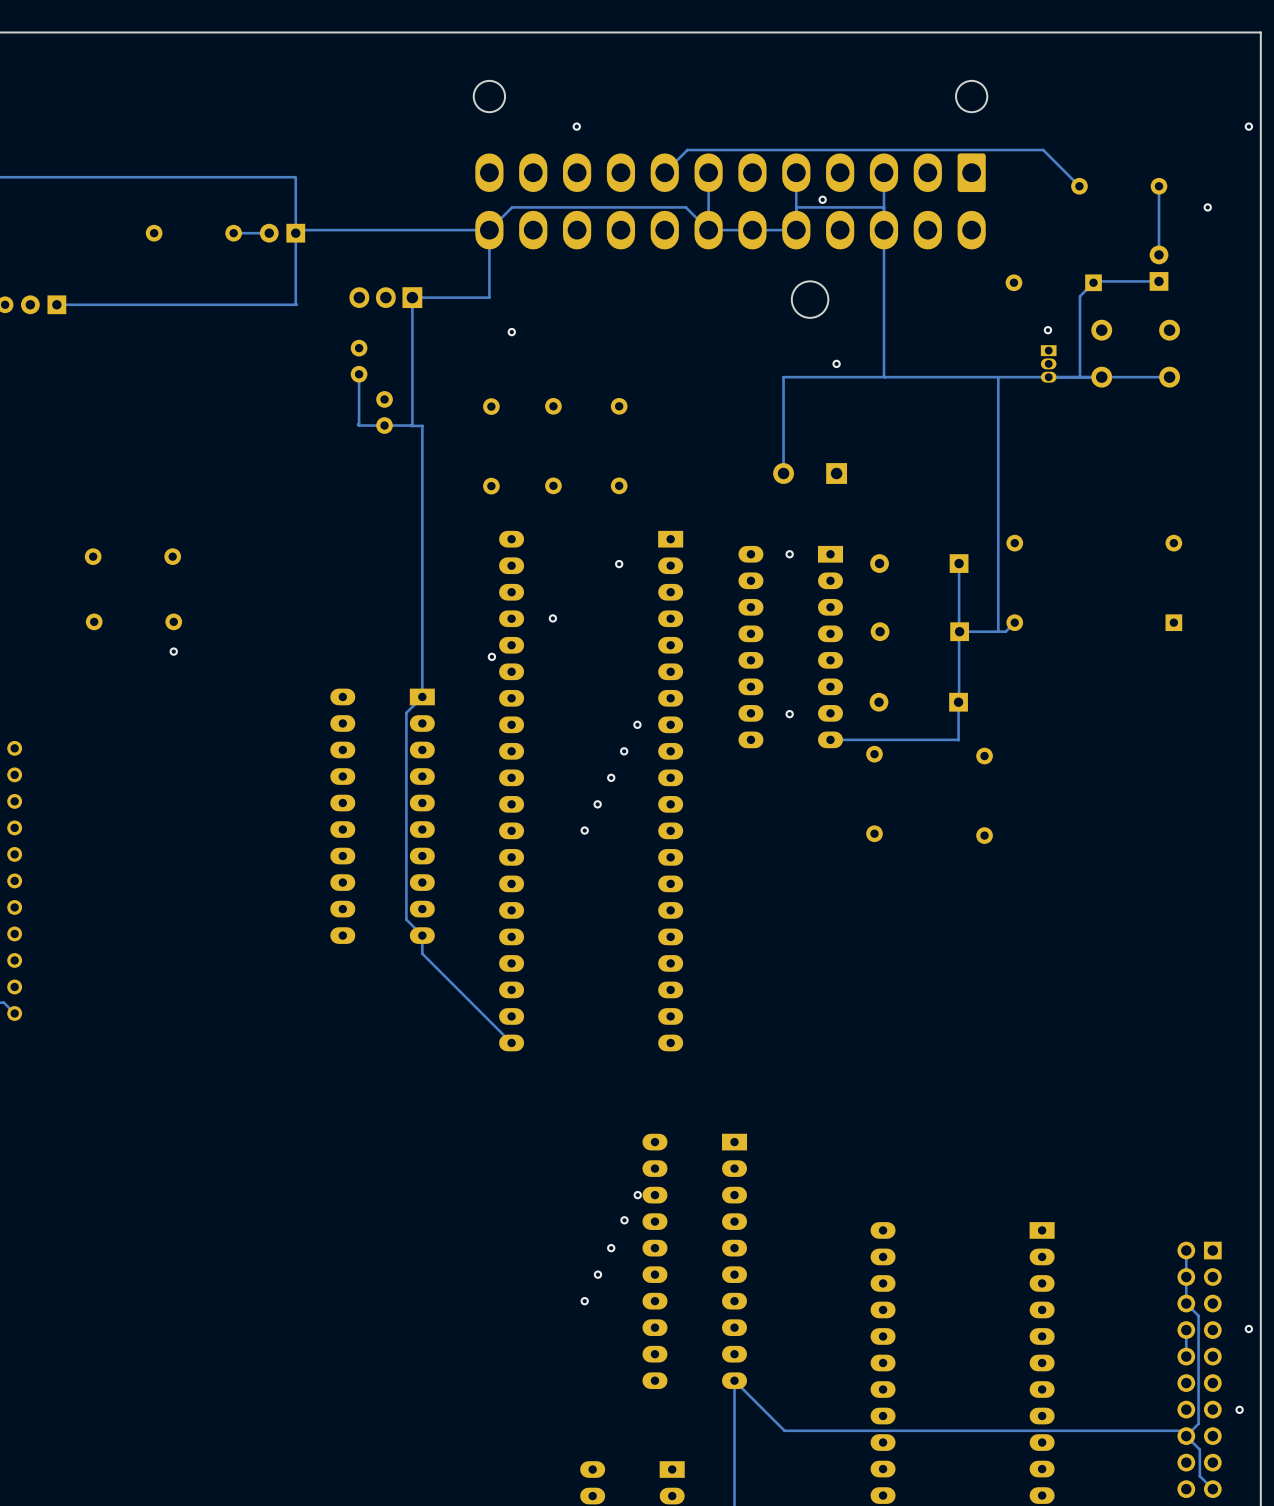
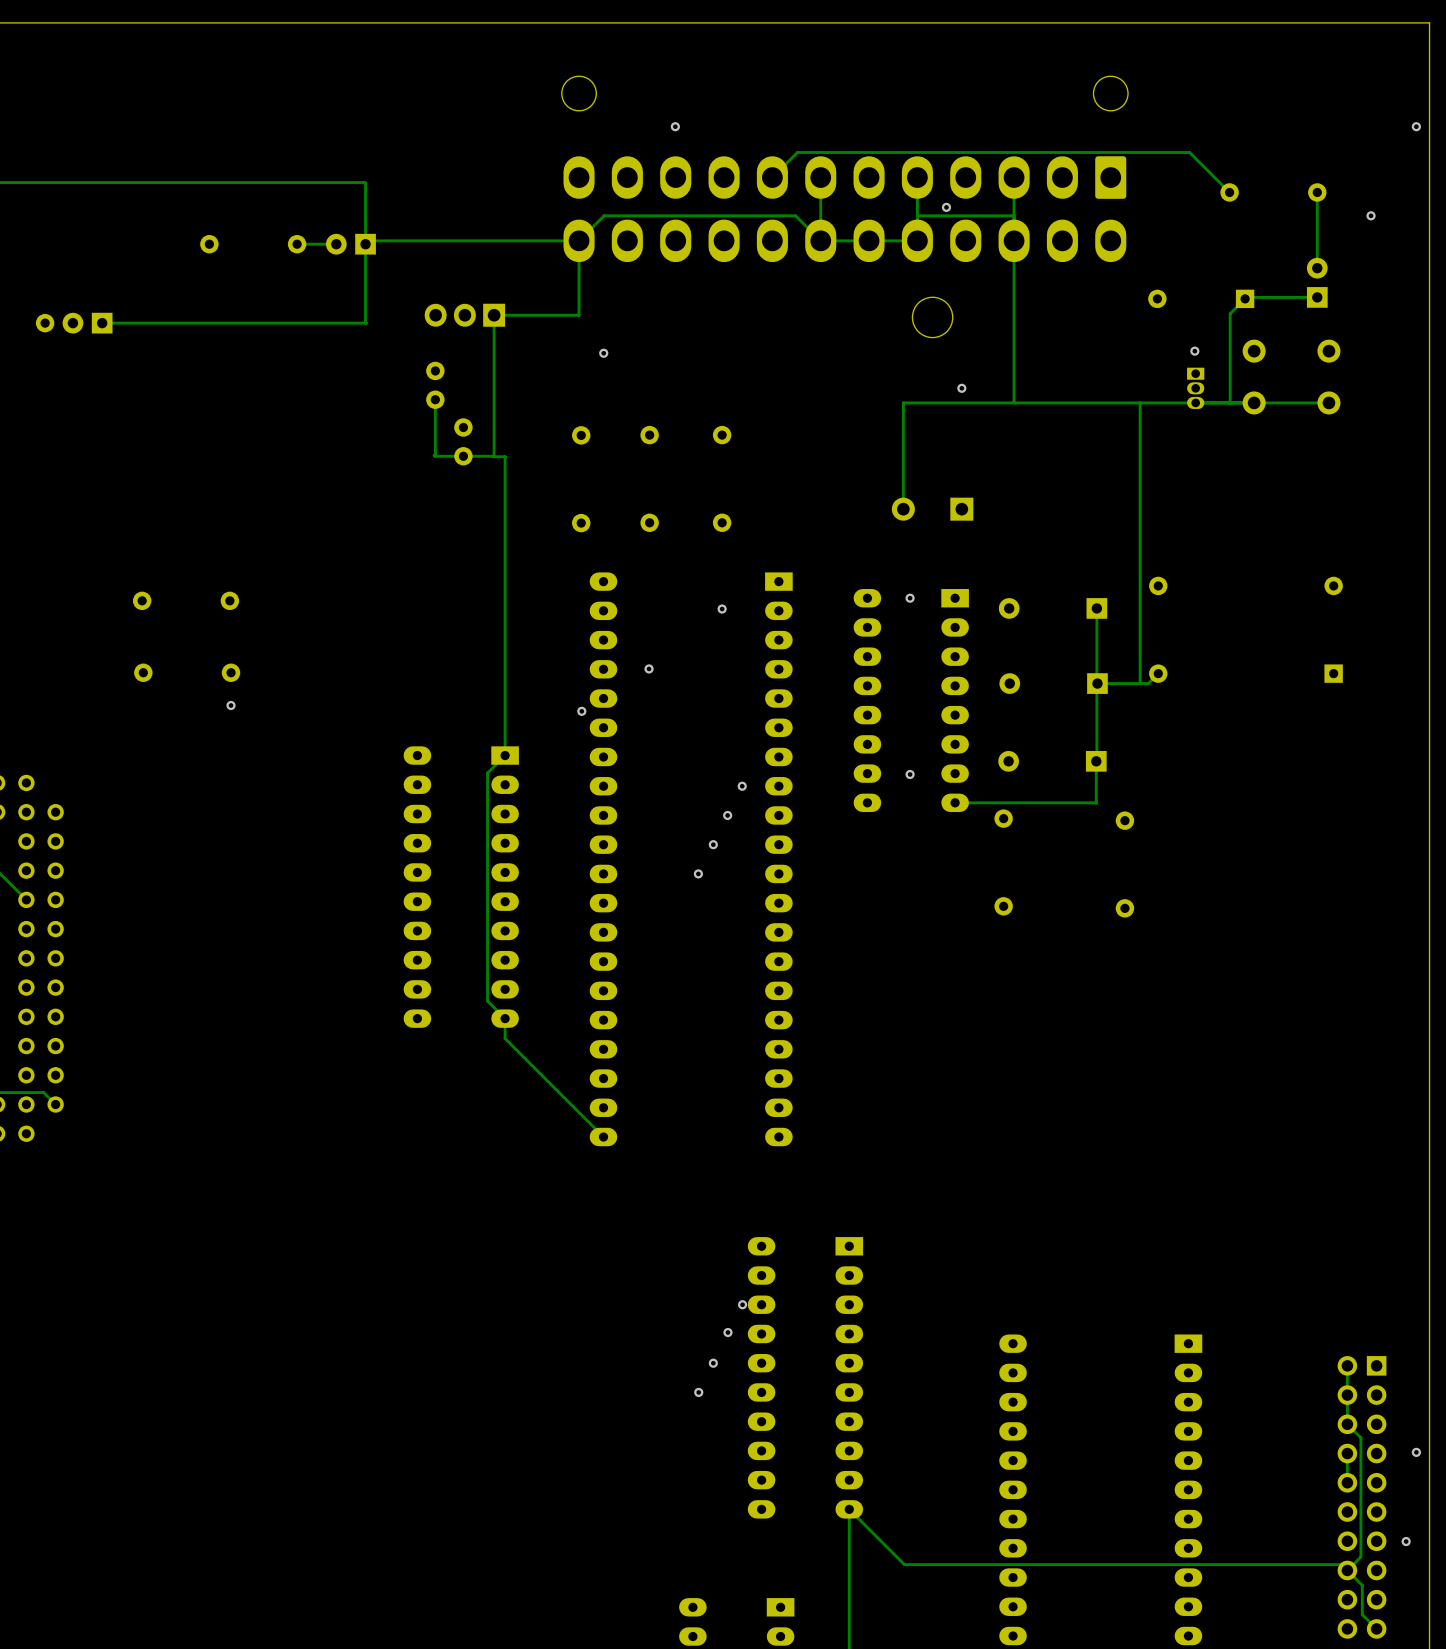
via: (584, 830) -> none
via: (584, 1301) -> none

